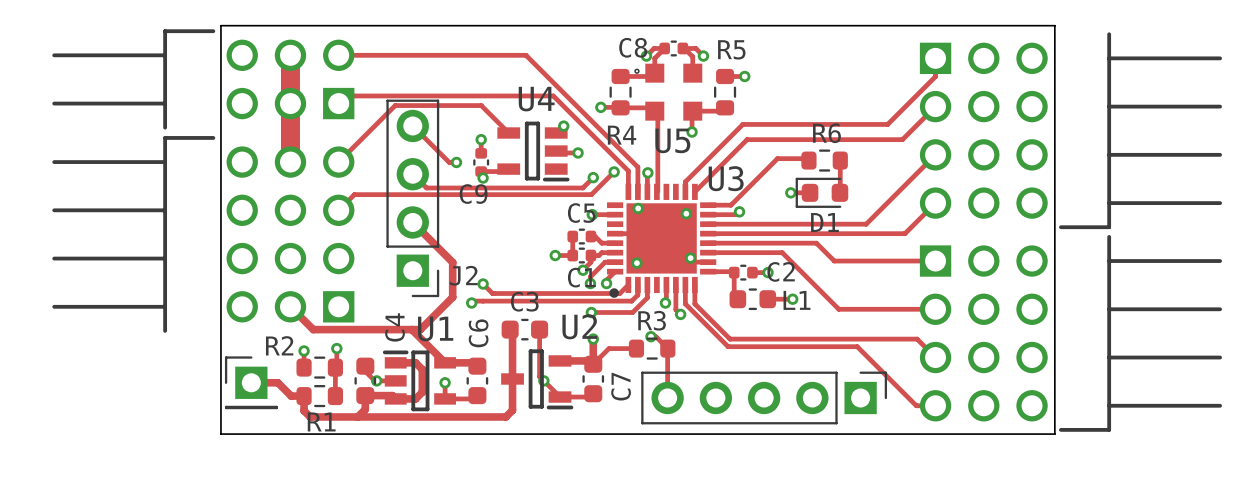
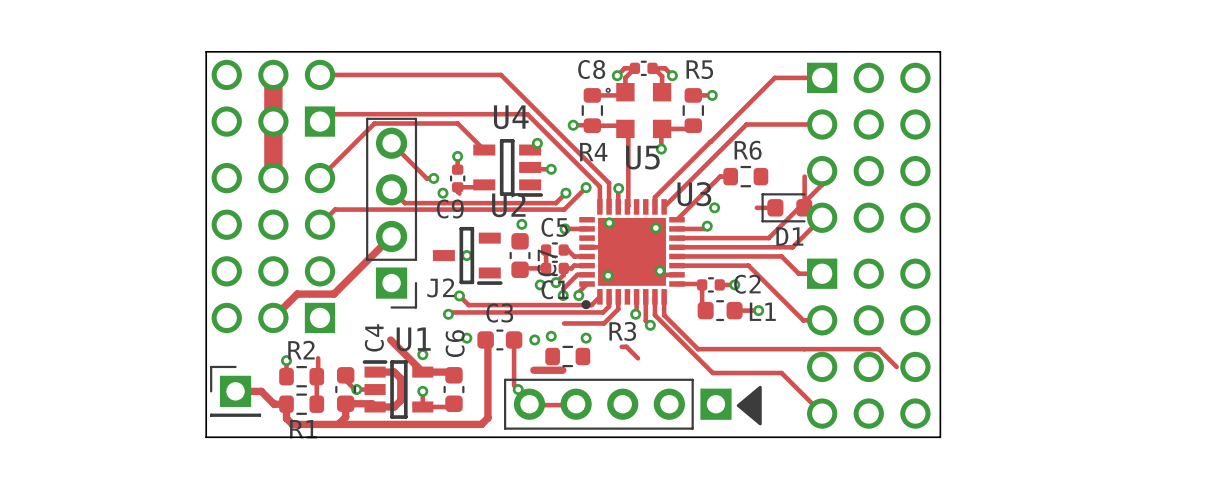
board edge: (220, 31) (220, 25) (1054, 25) (1054, 434) (220, 434) (220, 430) -> (206, 51) (940, 51) (940, 437) (206, 437)
C8 name position: C8 (633, 47) -> C8 (591, 69)
track: (935, 58) (935, 76) (887, 124) (743, 124) -> (822, 77) (774, 77) (710, 141)
part: (203, 79) -> none
track: (935, 106) (902, 139) (747, 139) -> (822, 124) (746, 124) (714, 156)
part: none -> (868, 147)
part: (1070, 130) -> none
track: (935, 154) (866, 224) (803, 224) -> (822, 171) (822, 184) (768, 238)
track: (807, 158) (777, 158) (730, 205) (708, 205) -> (730, 176) (720, 176) (676, 219)
R6 position: (824, 160) -> (745, 176)
via position: (483, 178) -> (442, 193)
via position: (790, 192) -> (714, 207)
track: (935, 203) (904, 233) (827, 233) -> (822, 217) (792, 247)
via: none -> (521, 224)
track: (412, 222) (452, 262) (452, 297) (420, 329) (313, 329) (290, 306) -> (391, 236) (333, 294) (297, 294) (273, 317)
part: (203, 234) -> none
part: none -> (273, 248)
via: none -> (466, 255)
via position: (555, 255) -> (540, 284)
track: (858, 261) (935, 261) -> none
track: (858, 309) (935, 309) -> none
via: (591, 312) -> none
via: none -> (551, 336)
via: none -> (466, 338)
via: none -> (586, 338)
via: none -> (534, 339)
part: none -> (868, 343)
part: (1070, 333) -> none
via: (650, 336) -> none
track: (593, 339) (593, 364) (608, 348) (636, 348) -> none
via: (593, 339) -> none
via: none -> (422, 354)
R2 name position: R2 (279, 345) -> R2 (301, 350)
track: (728, 346) (857, 346) (916, 405) (935, 405) -> (696, 356) (712, 373) (781, 373) (822, 413)
via: (336, 348) -> none
R3 position: (652, 348) -> (567, 356)
track: (667, 348) (667, 397) -> none
drawing: none -> [736, 385, 762, 426]
C7 position: (593, 378) -> (520, 255)
U2 position: (537, 379) -> (467, 255)
part: none -> (617, 404)
part: (764, 397) -> none

